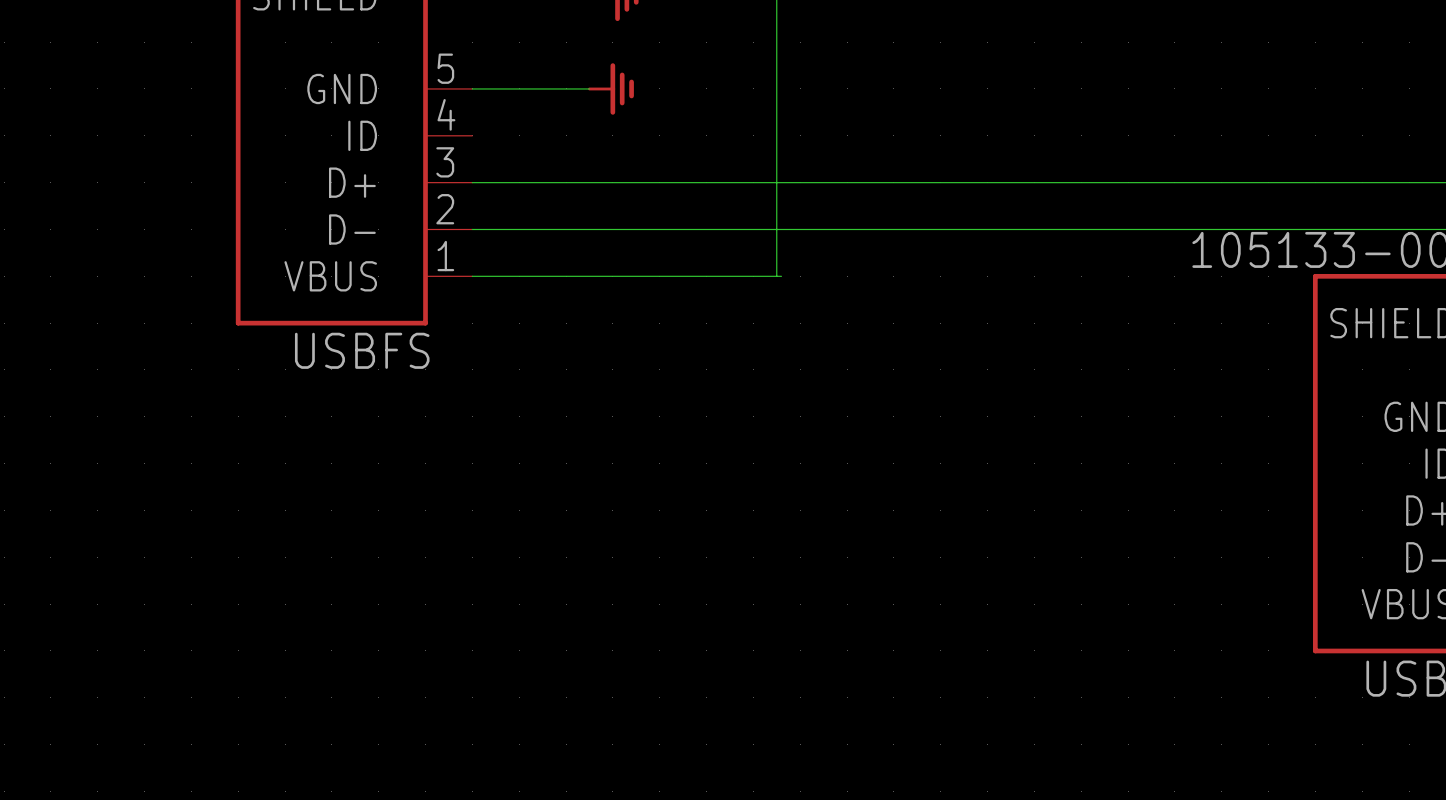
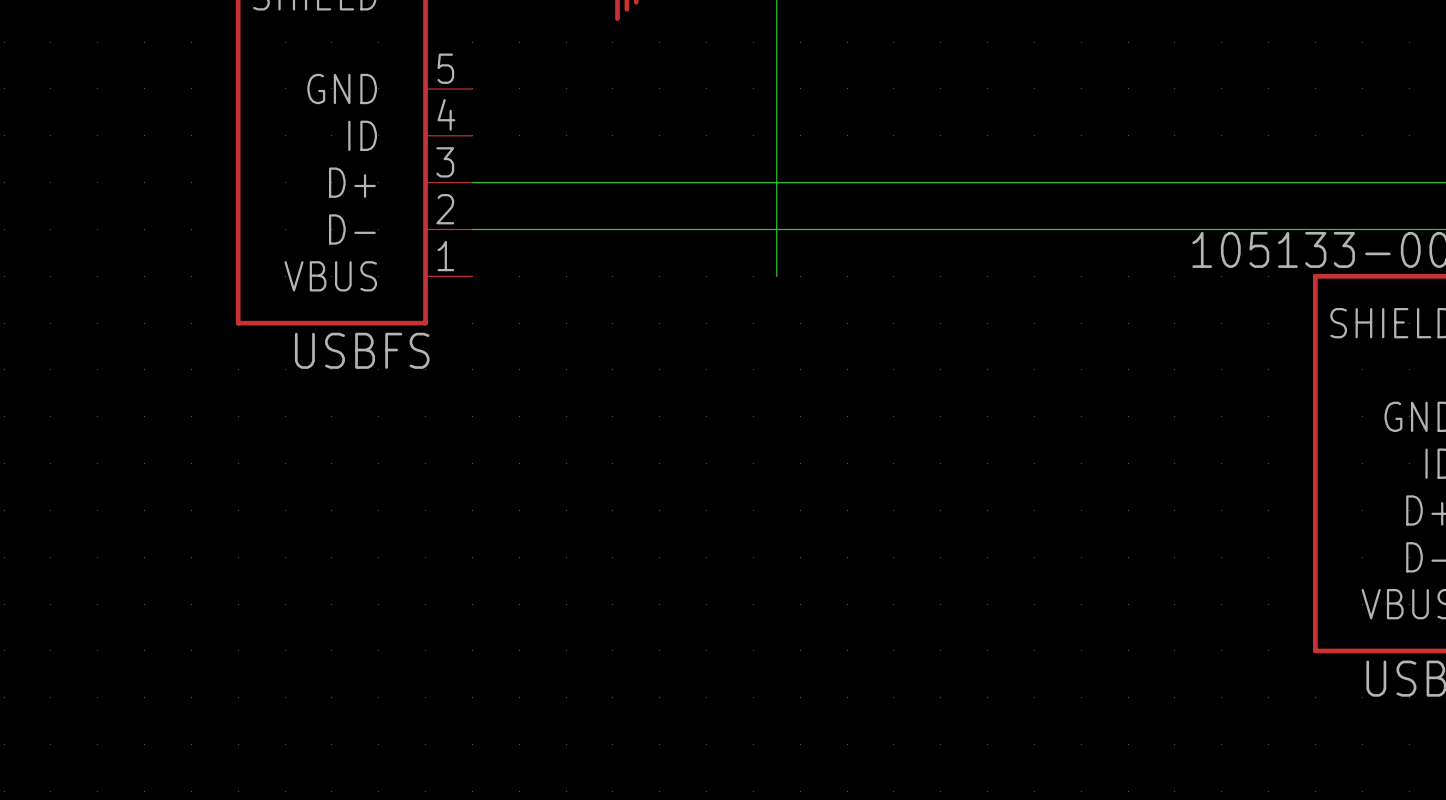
wire: (472, 88) (589, 88) -> none
power symbol: (610, 88) -> none
wire: (472, 276) (781, 276) -> none

